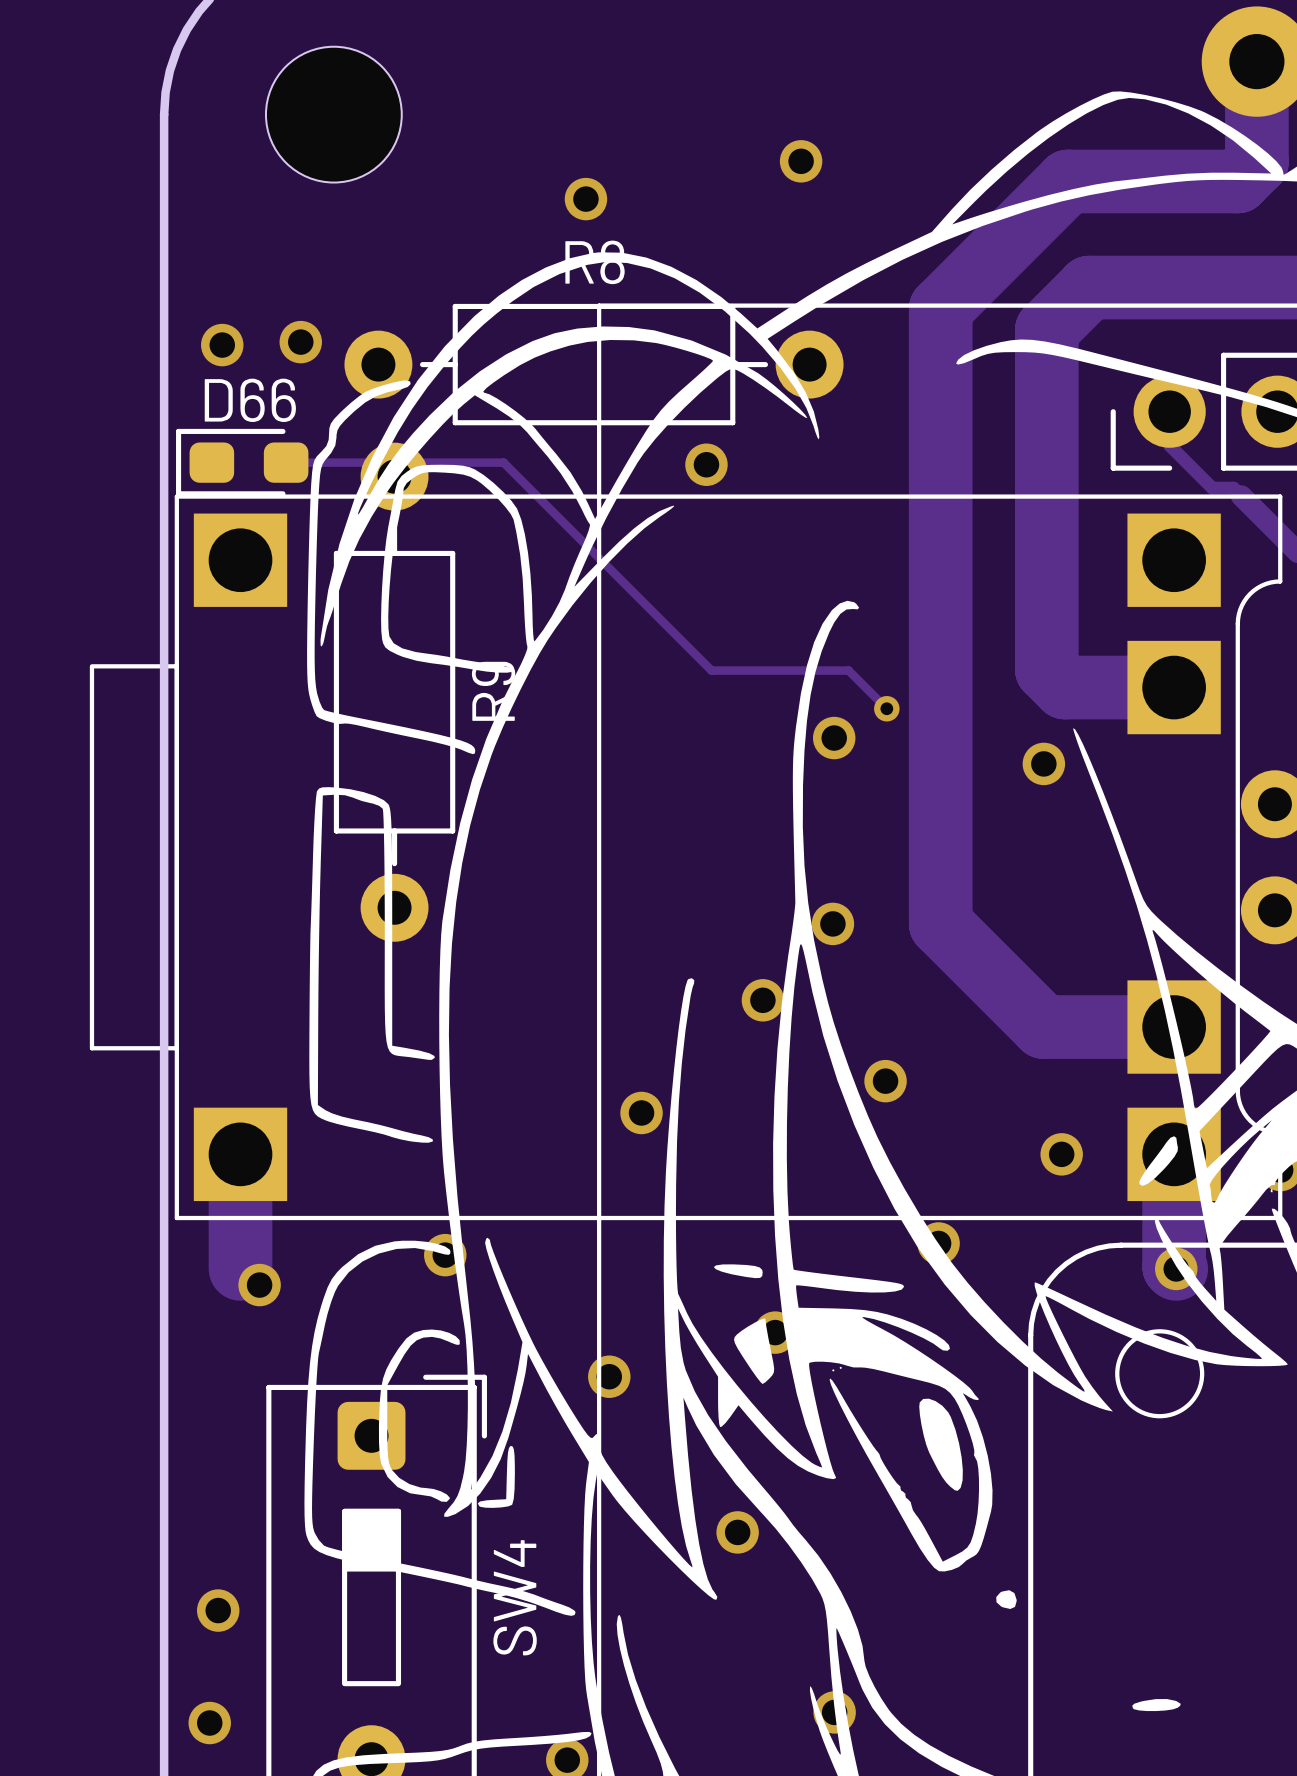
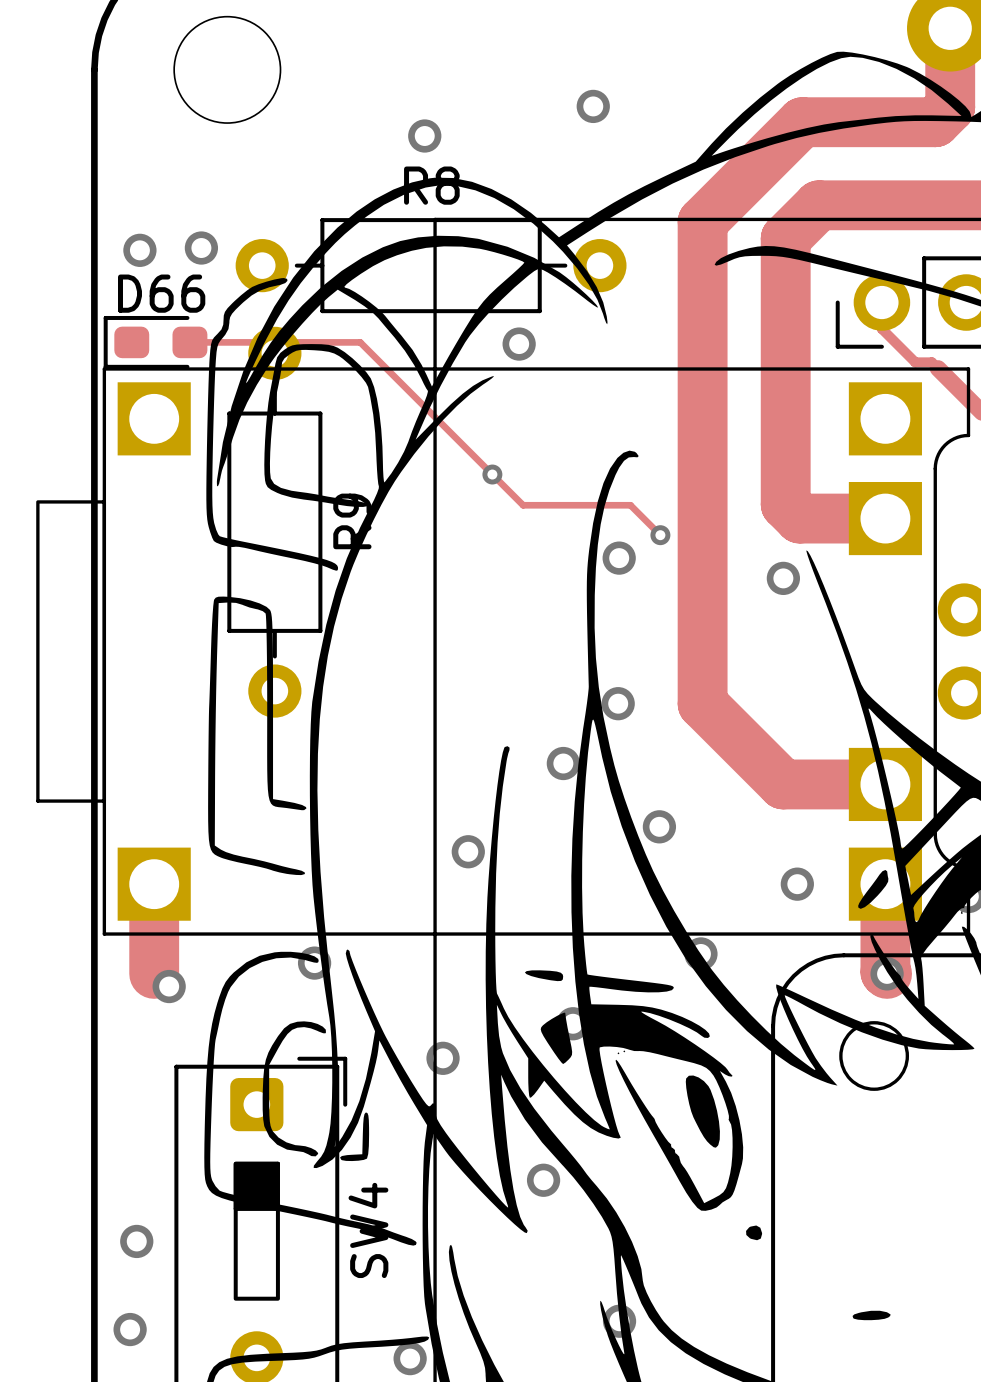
via: none -> (492, 474)

